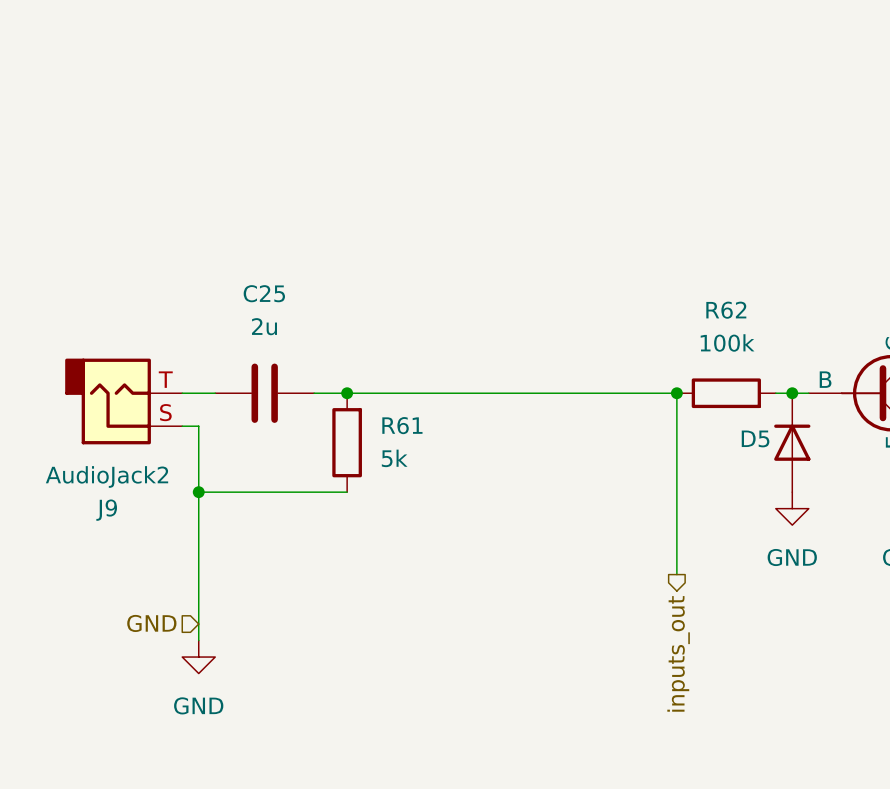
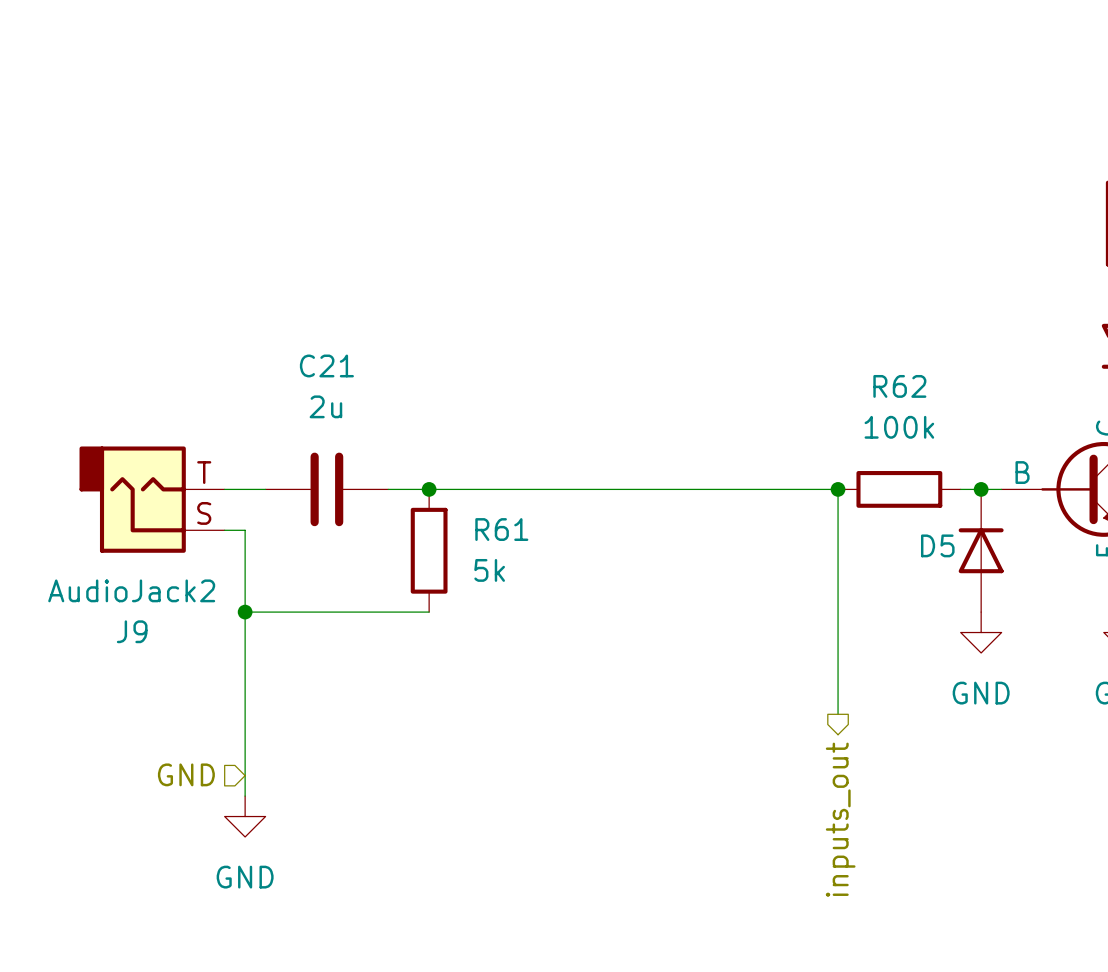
C25 name: C25 (264, 293) -> C21 (326, 365)

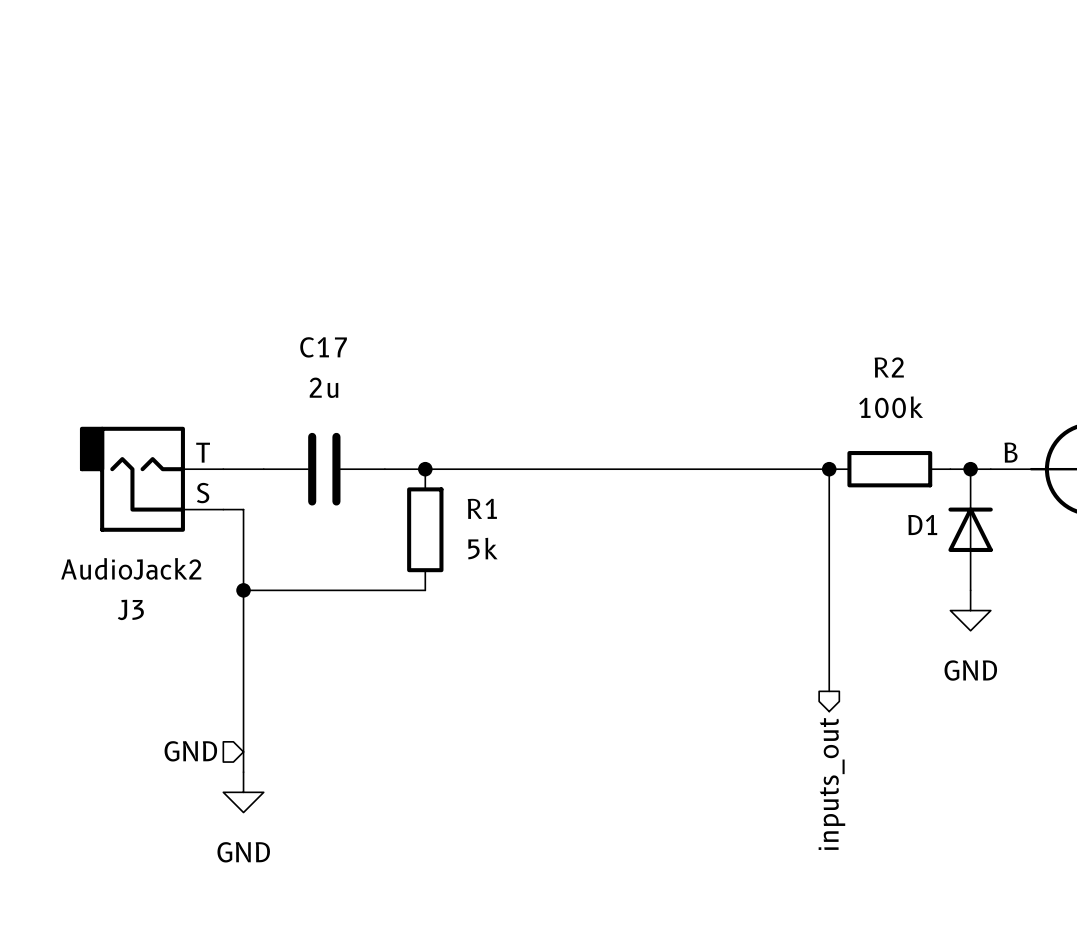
C21 name: C21 (326, 365) -> C17 (323, 347)
R62 name: R62 (899, 386) -> R2 (889, 367)
R61 name: R61 (501, 529) -> R1 (482, 508)
D5 name: D5 (937, 545) -> D1 (922, 524)
J9 name: J9 (132, 631) -> J3 (130, 609)

